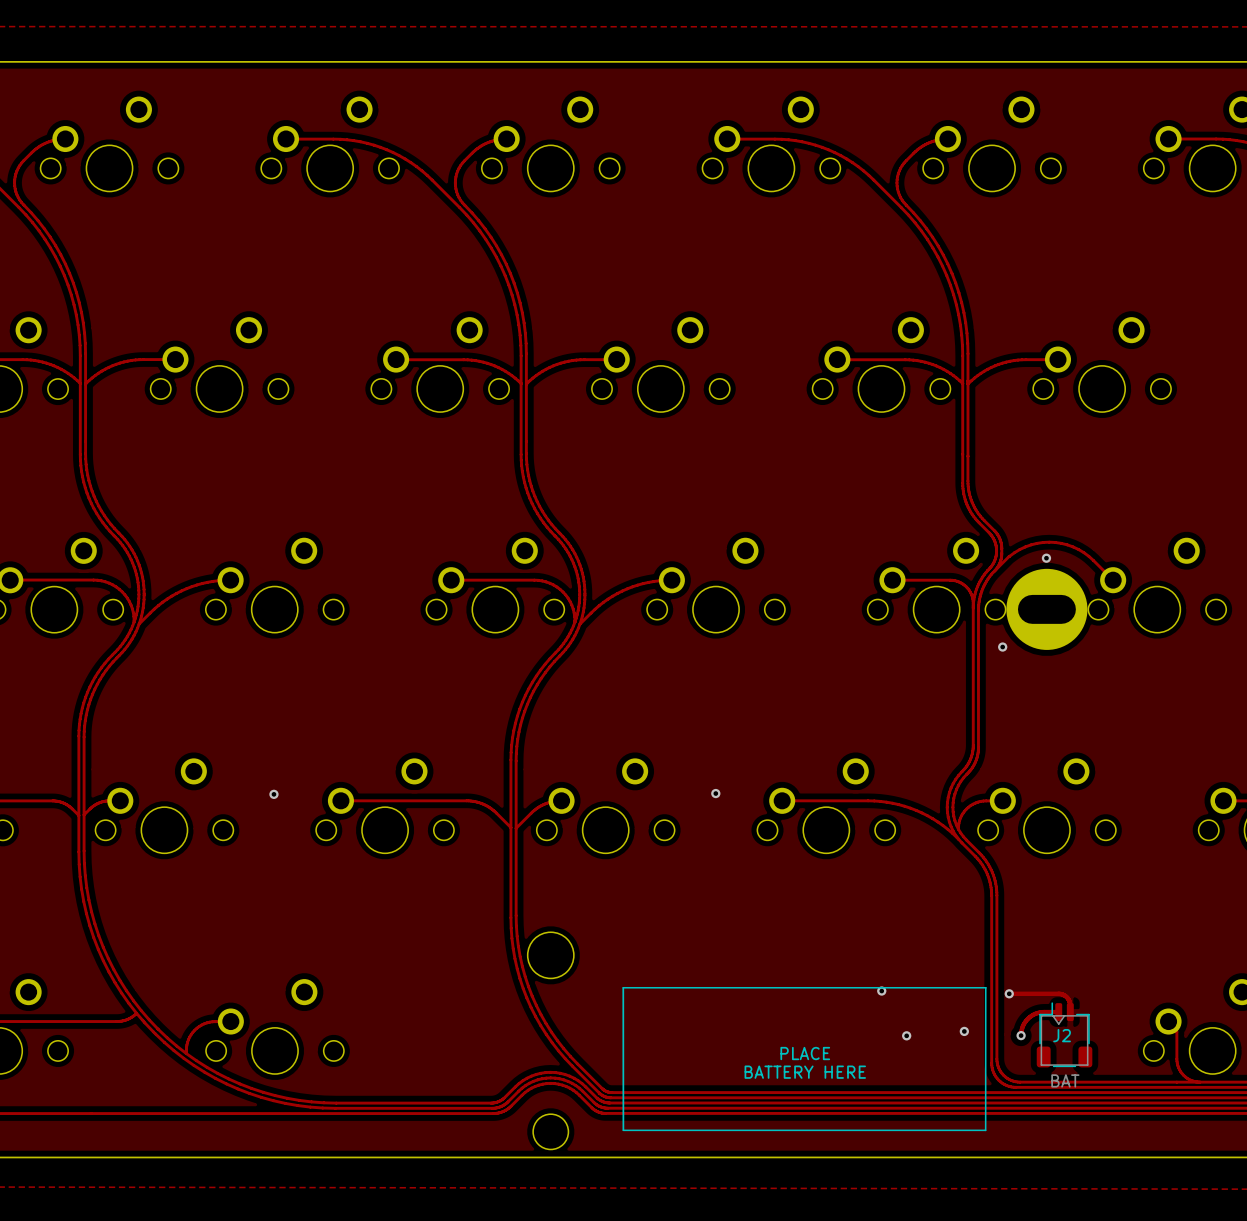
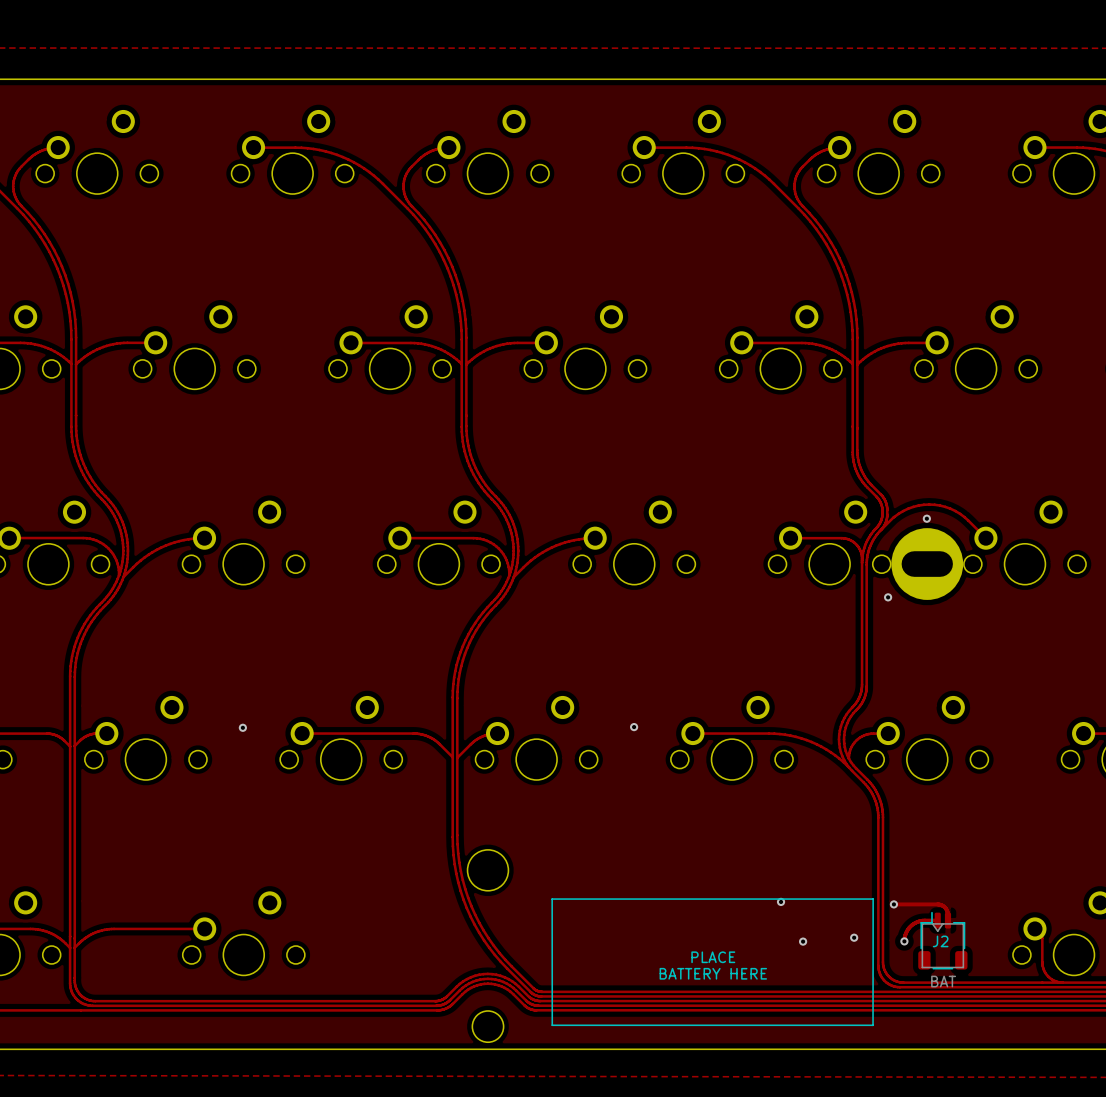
track: (84, 850) (86, 887) (91, 912) (98, 935) (113, 969) (133, 1000) (149, 1019) (186, 1053) -> (74, 777) (74, 980) (76, 988) (80, 995) (87, 999) (95, 1001) (298, 1001)
track: (78, 851) (81, 889) (93, 937) (108, 971) (136, 1013) -> none
track: (136, 1013) (128, 1018) (119, 1021) (34, 1021) -> (70, 947) (51, 933) (30, 928)
track: (136, 1013) (173, 1050) (204, 1072) (226, 1083) (273, 1100) (297, 1105) (335, 1108) -> (70, 778) (70, 983) (71, 991) (76, 999) (84, 1004) (92, 1005) (297, 1005)
track: (230, 1021) (209, 1022) (199, 1026) (189, 1036) (186, 1053) -> (204, 928) (106, 929) (88, 935) (74, 947)
track: (186, 1053) (217, 1073) (251, 1088) (287, 1098) (336, 1103) -> none

